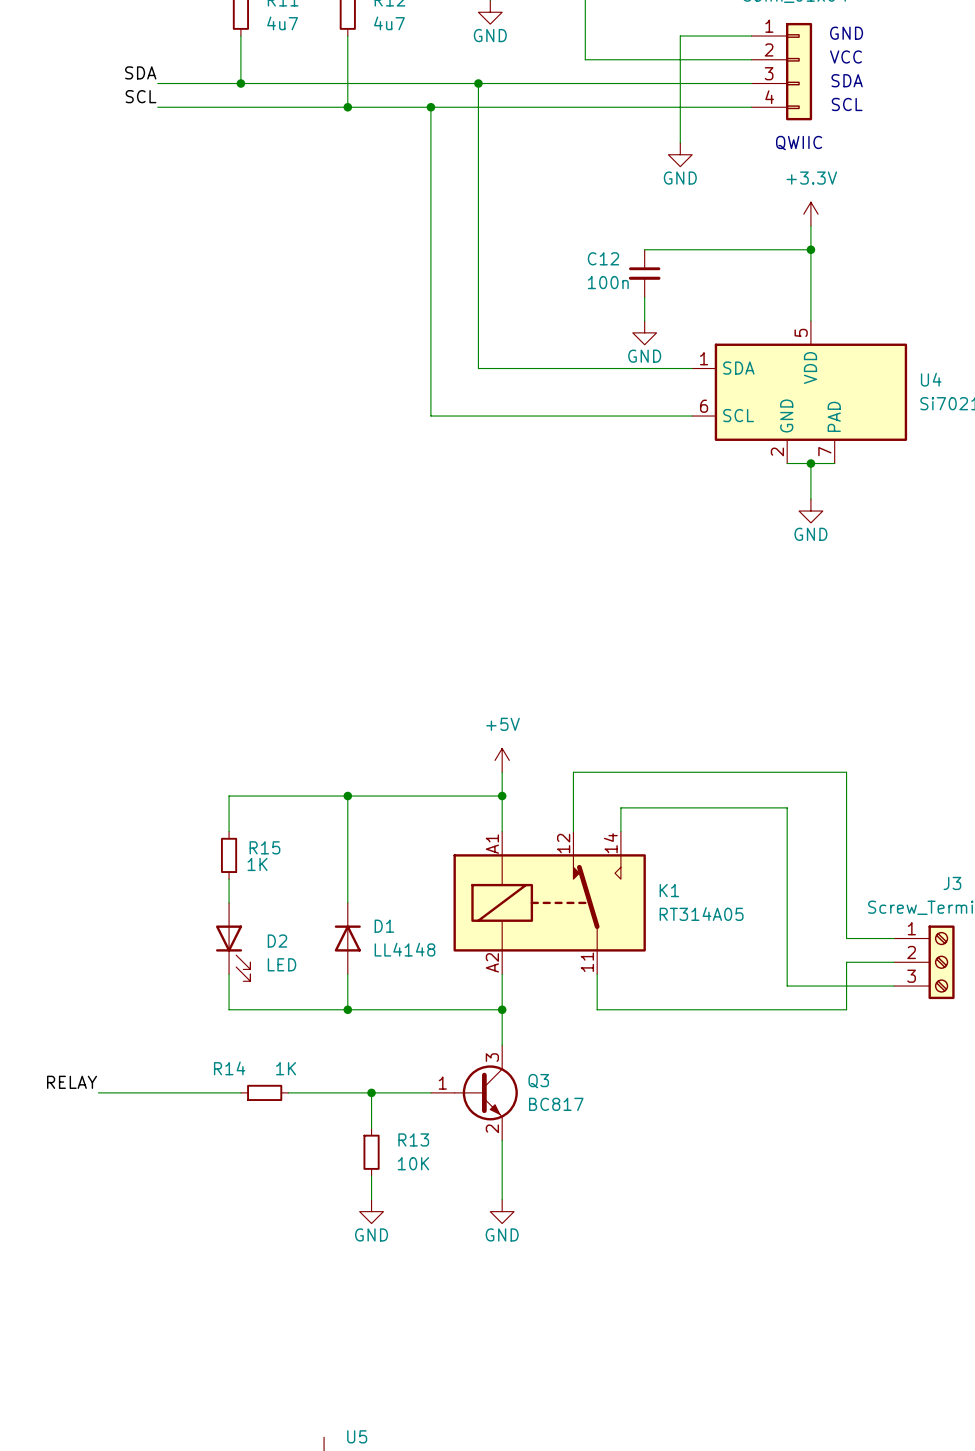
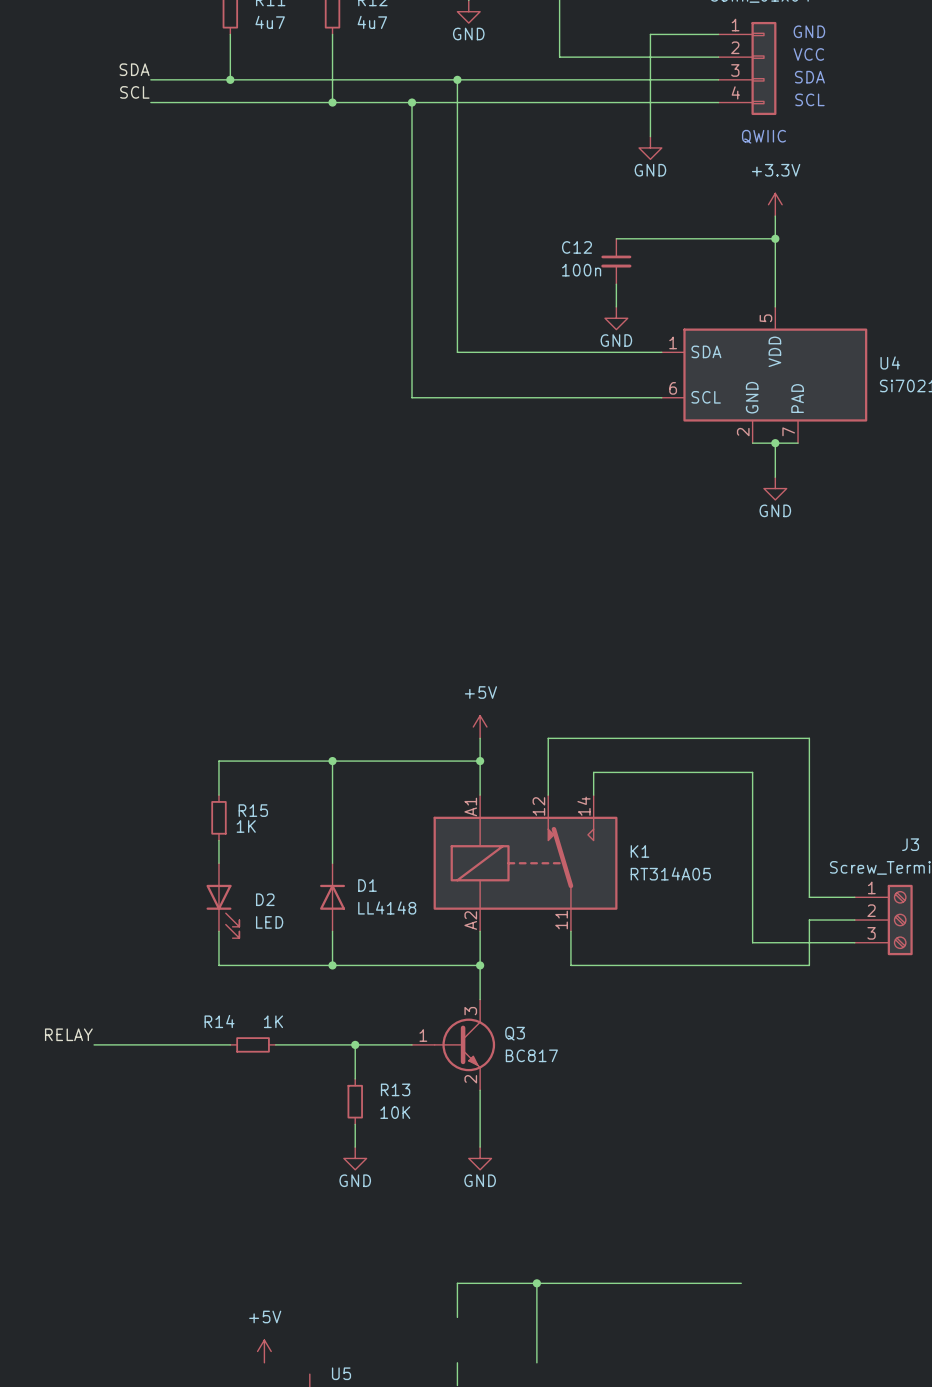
wire: none -> (536, 1283) (536, 1362)
junction: none -> (536, 1283)
wire: none -> (741, 1283) (457, 1283) (457, 1317)
power symbol: none -> +5V (264, 1351)
wire: none -> (457, 1362) (457, 1385)

